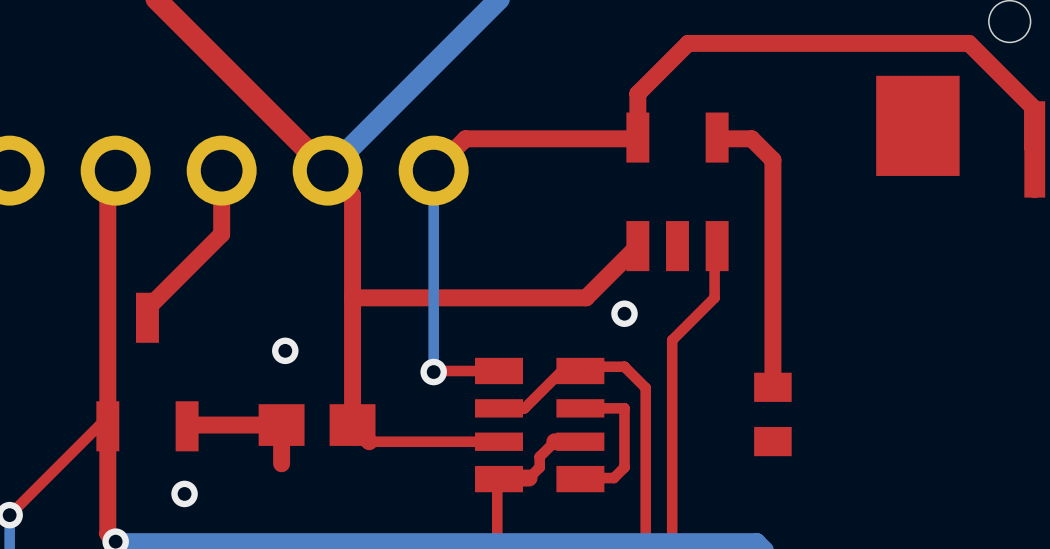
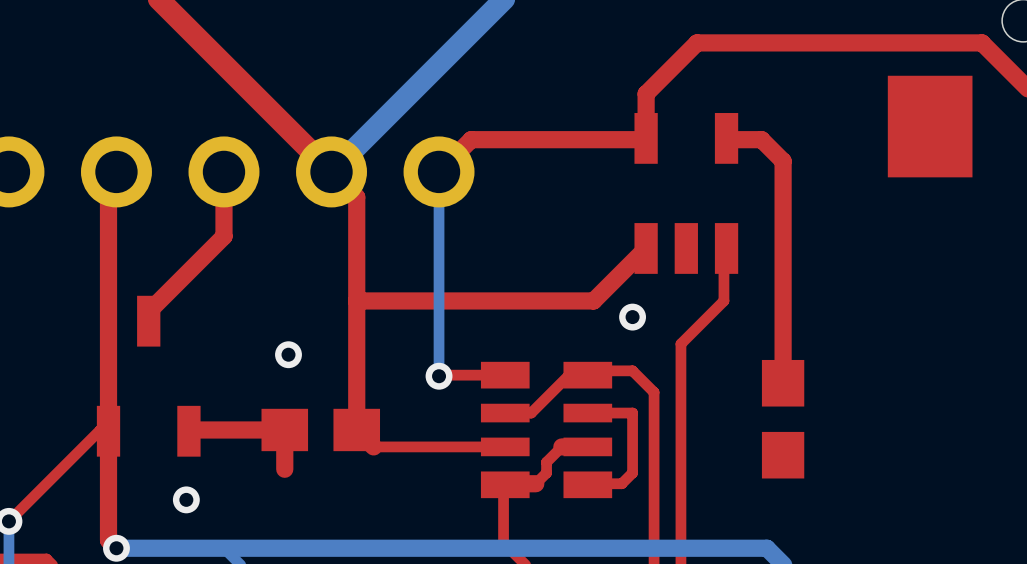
part footprint: [754, 372, 792, 457] -> [761, 359, 805, 479]

